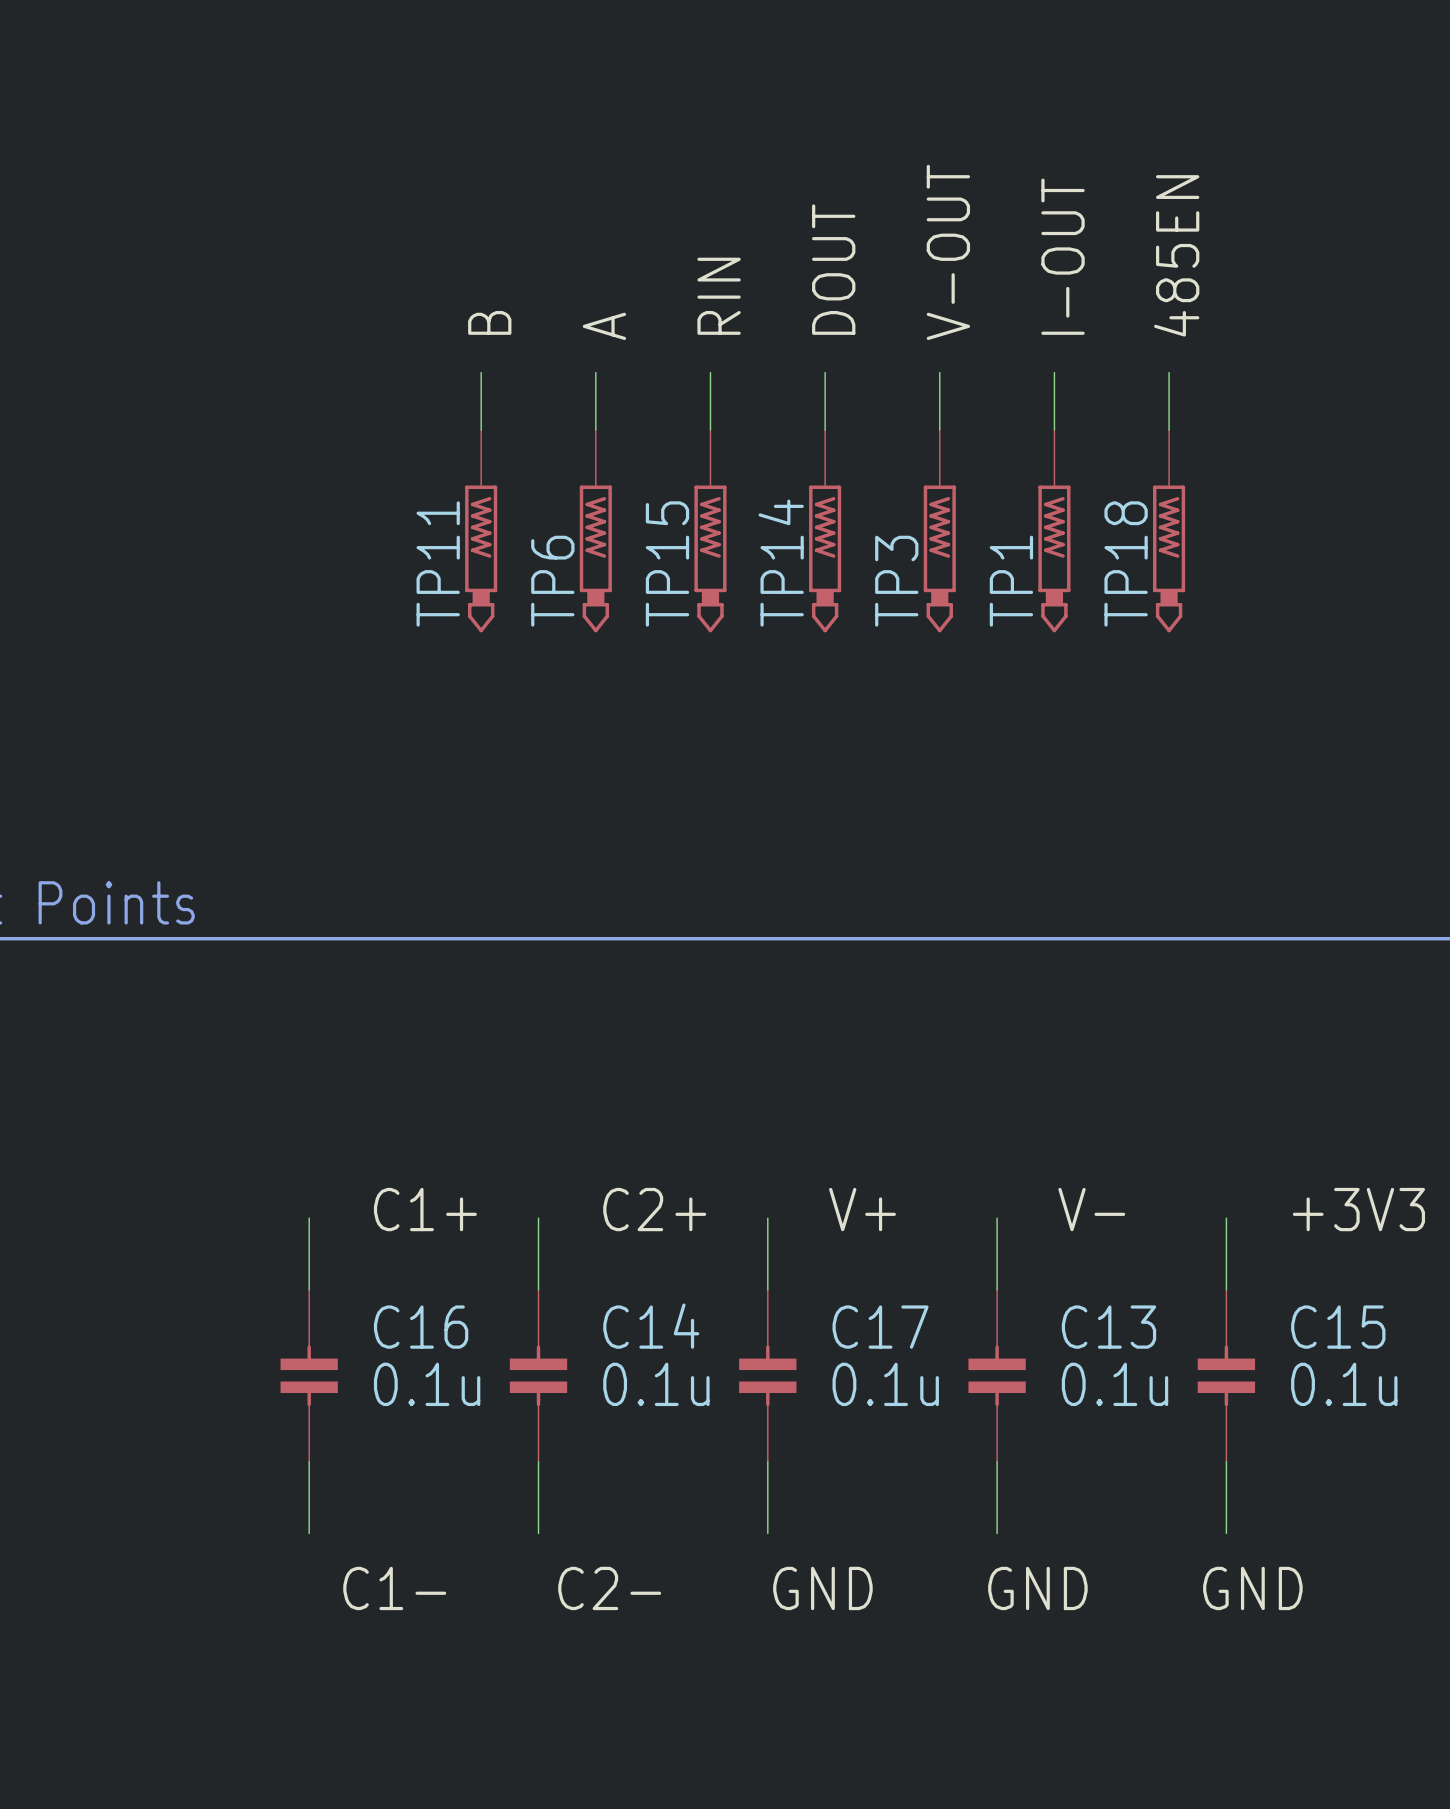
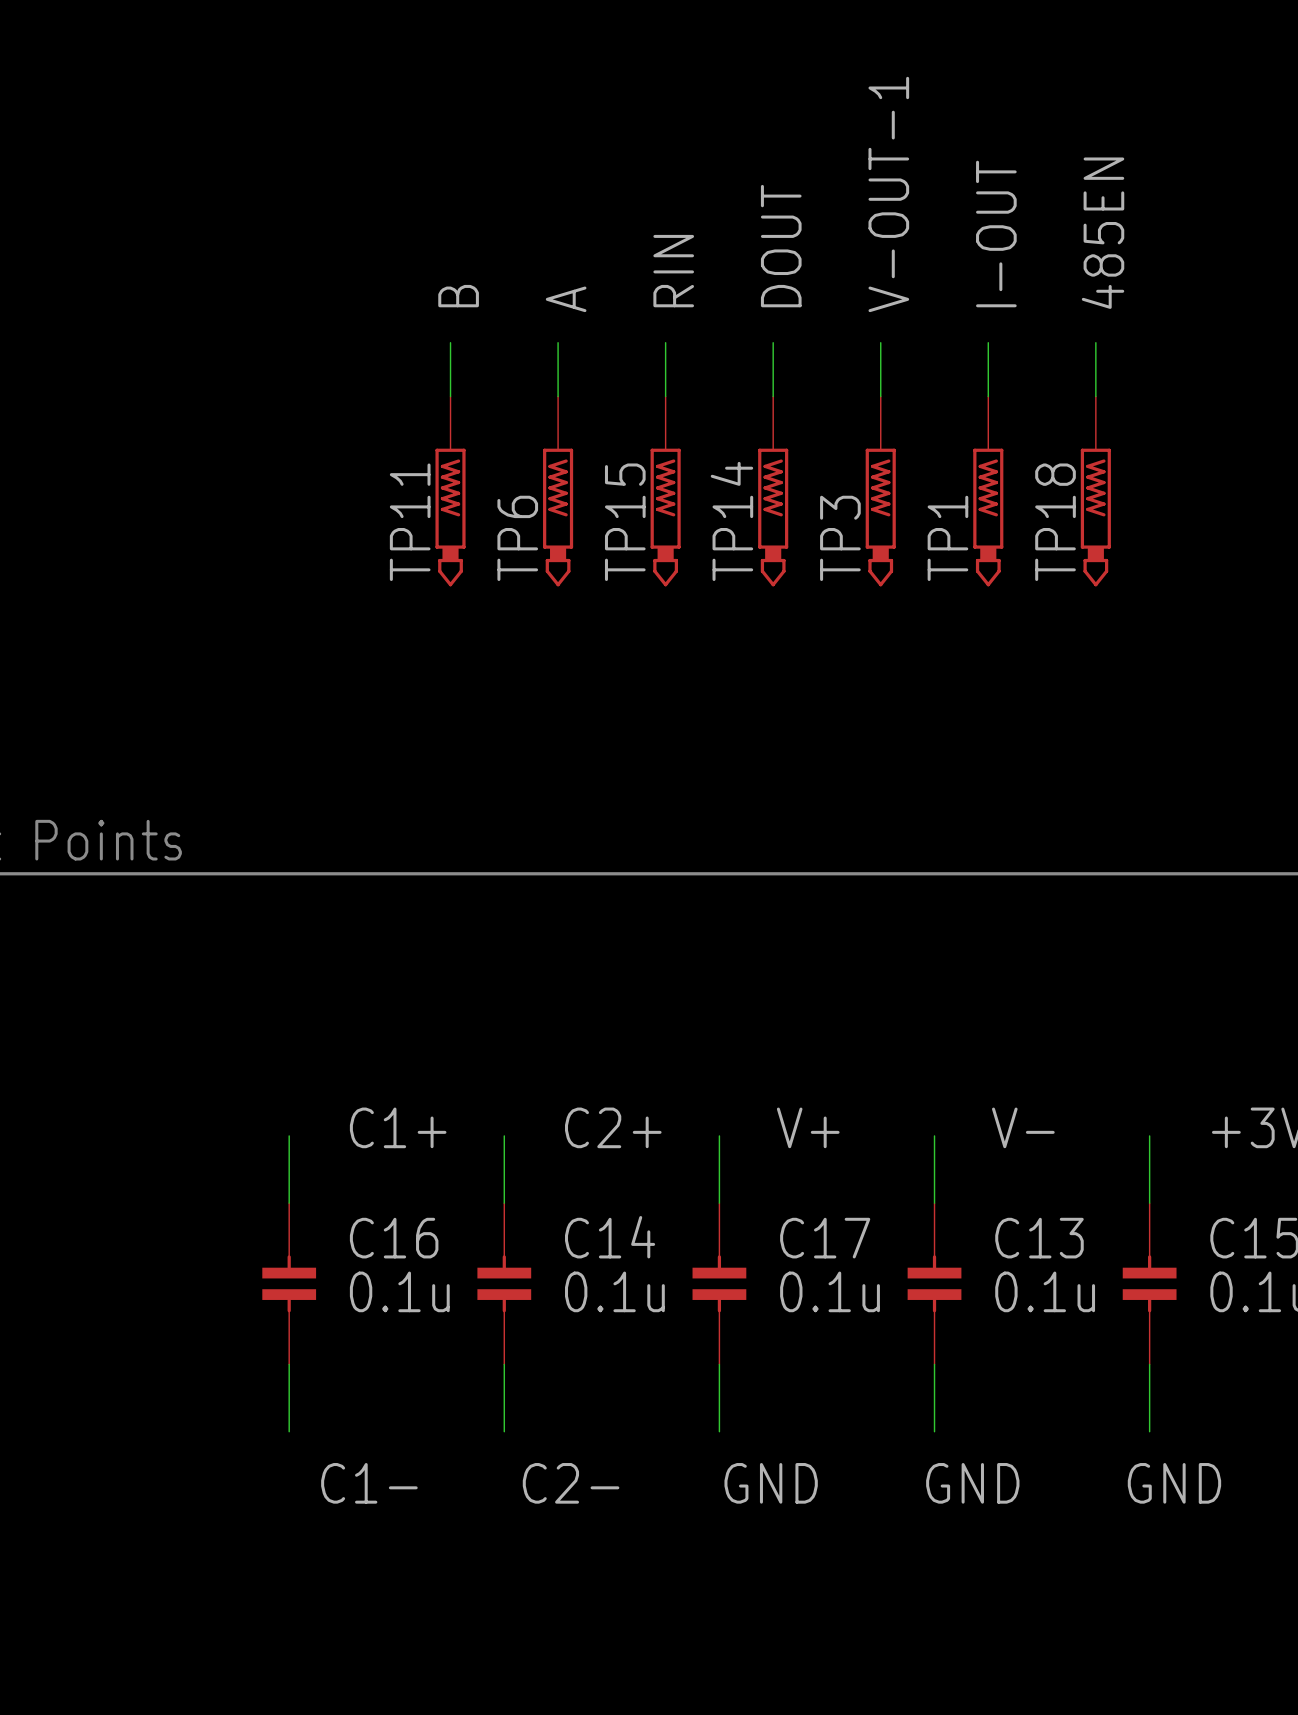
label: V-OUT (948, 252) -> V-OUT-1 (888, 194)

